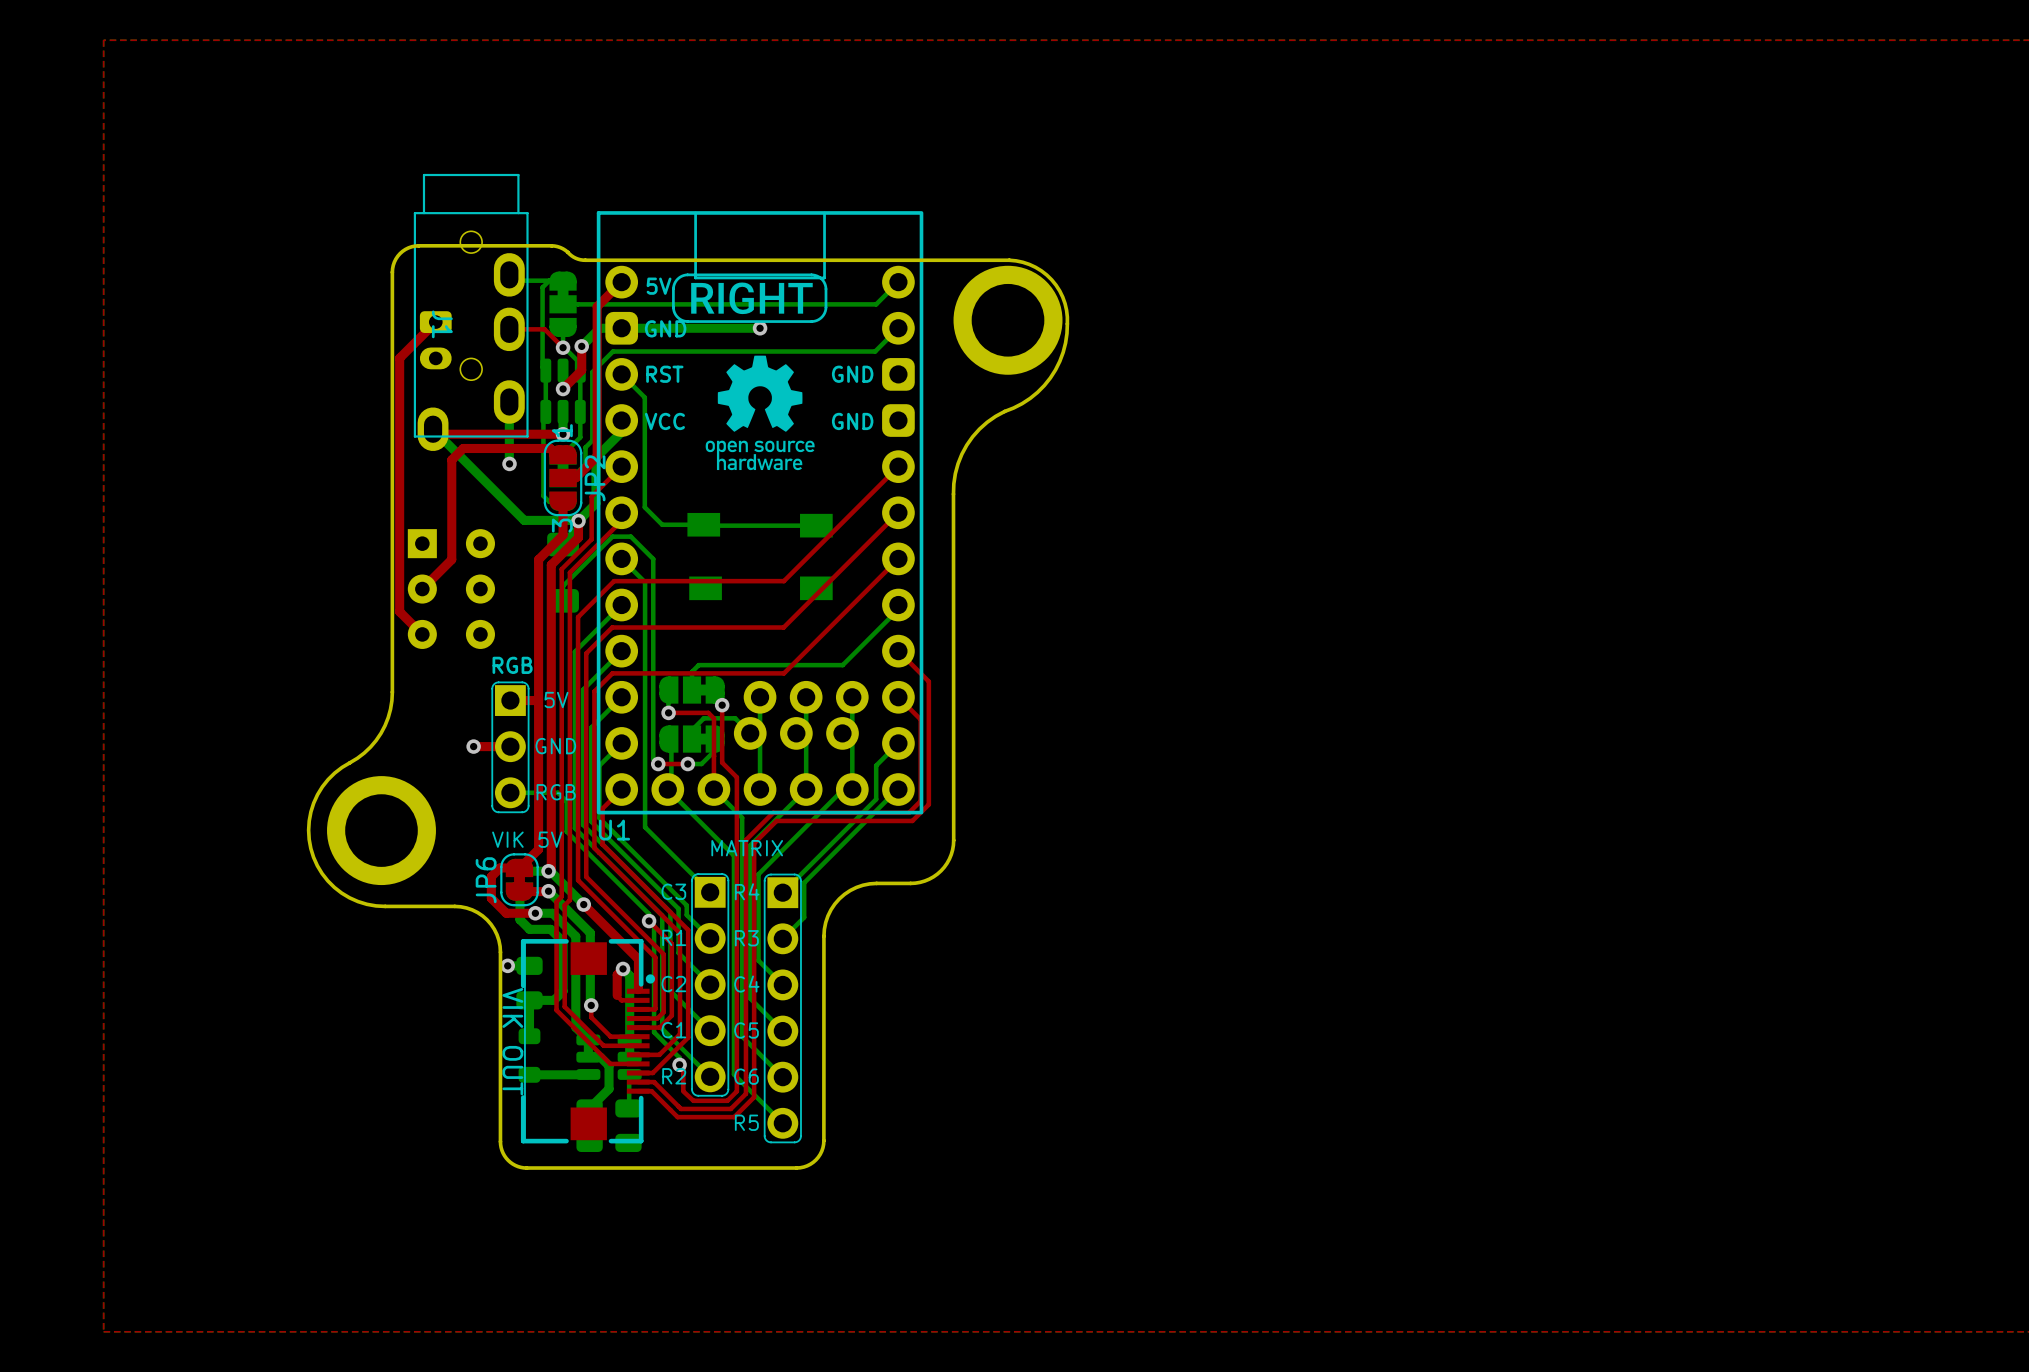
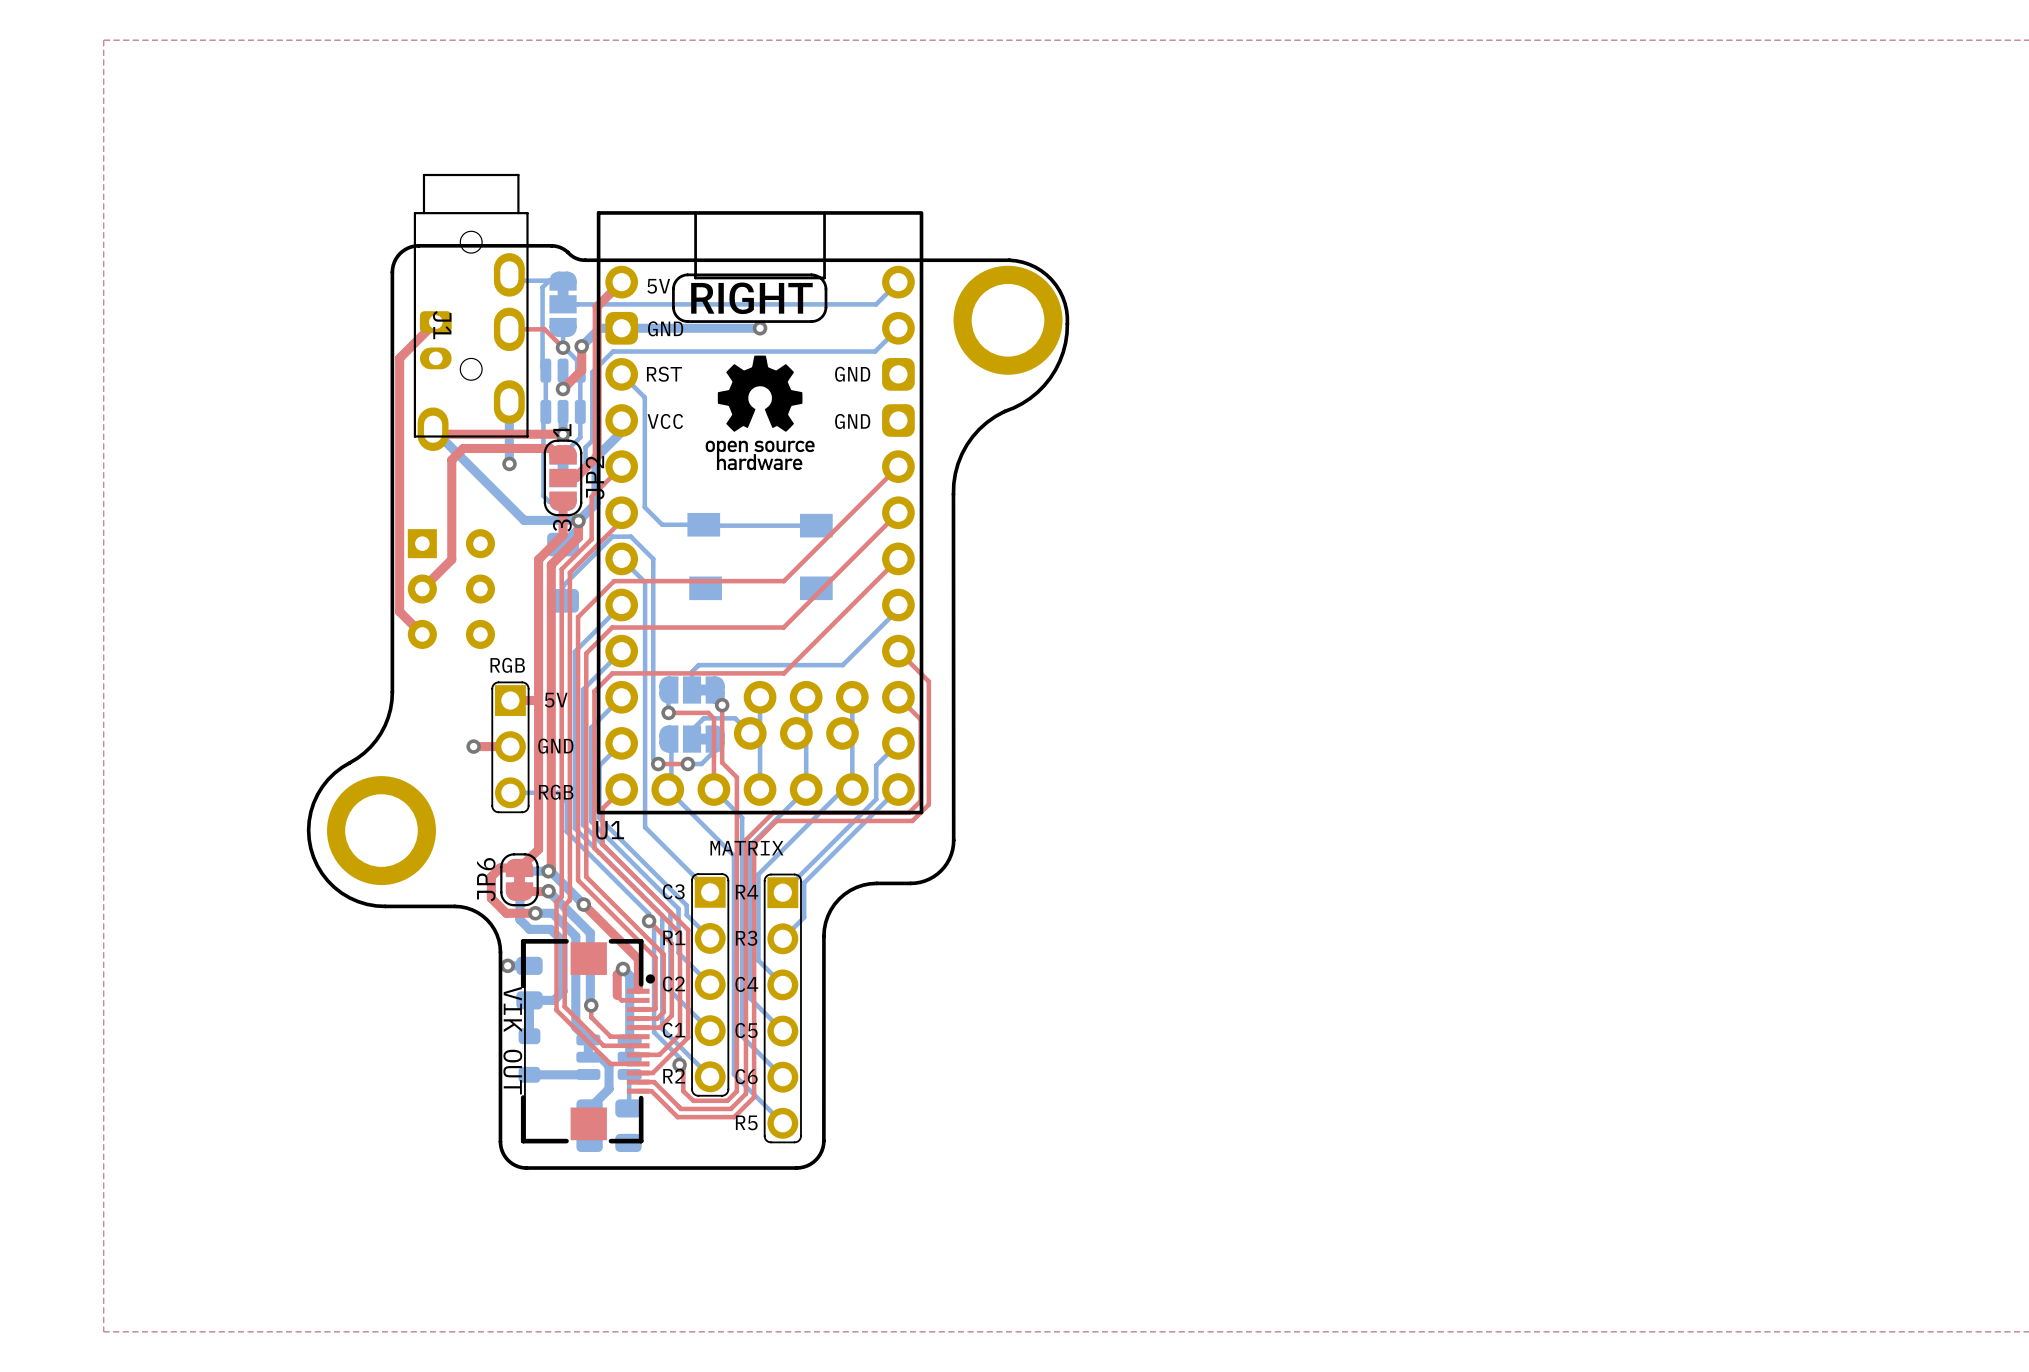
text: VIK 5V (527, 839) -> none

